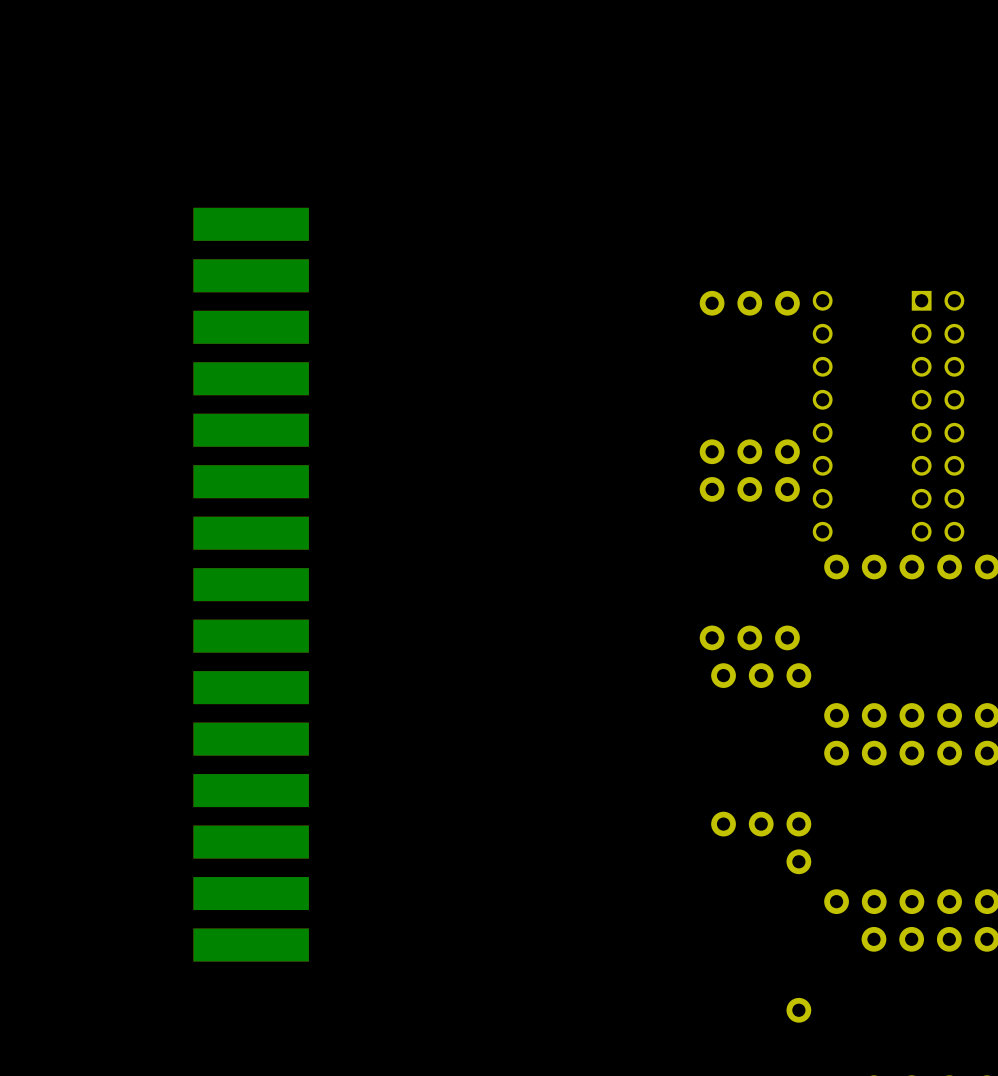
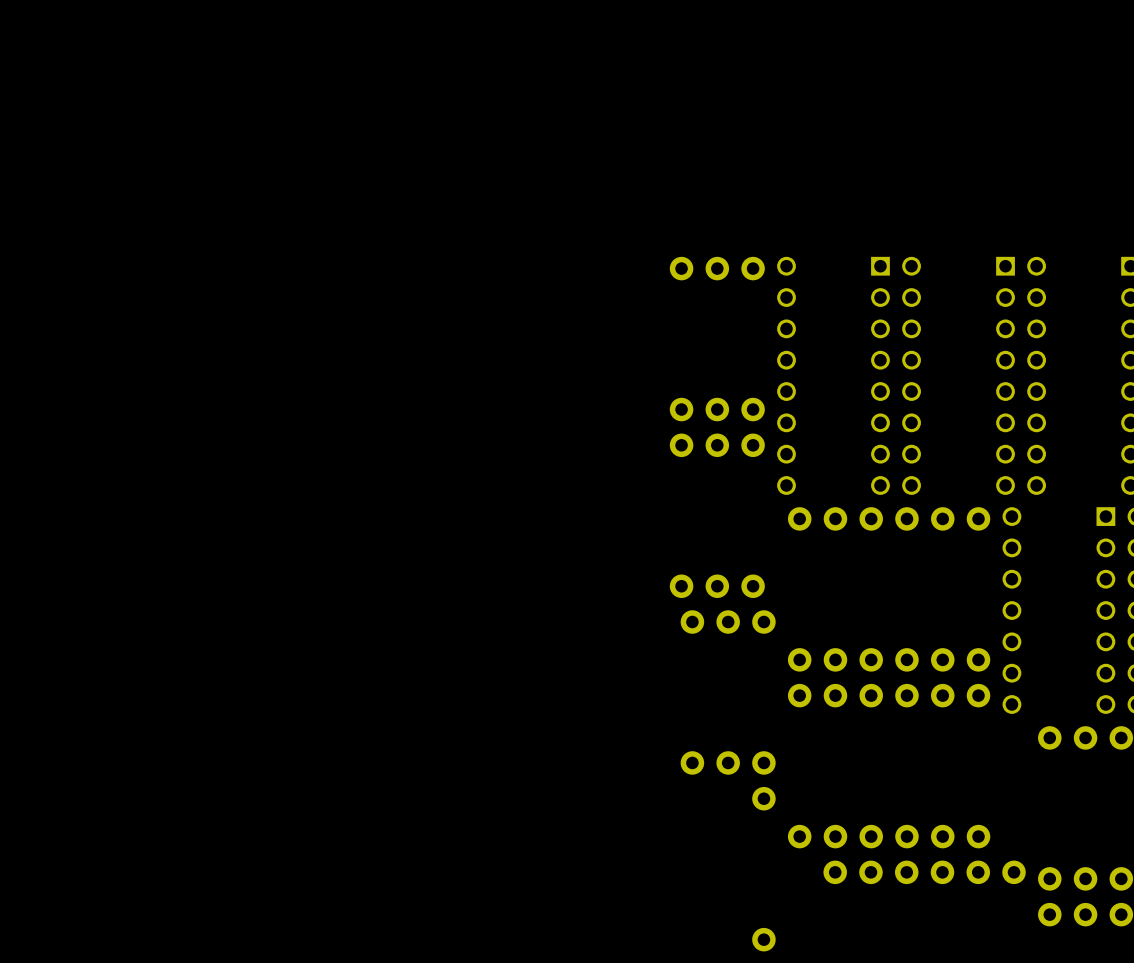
part: (251, 584) -> none

